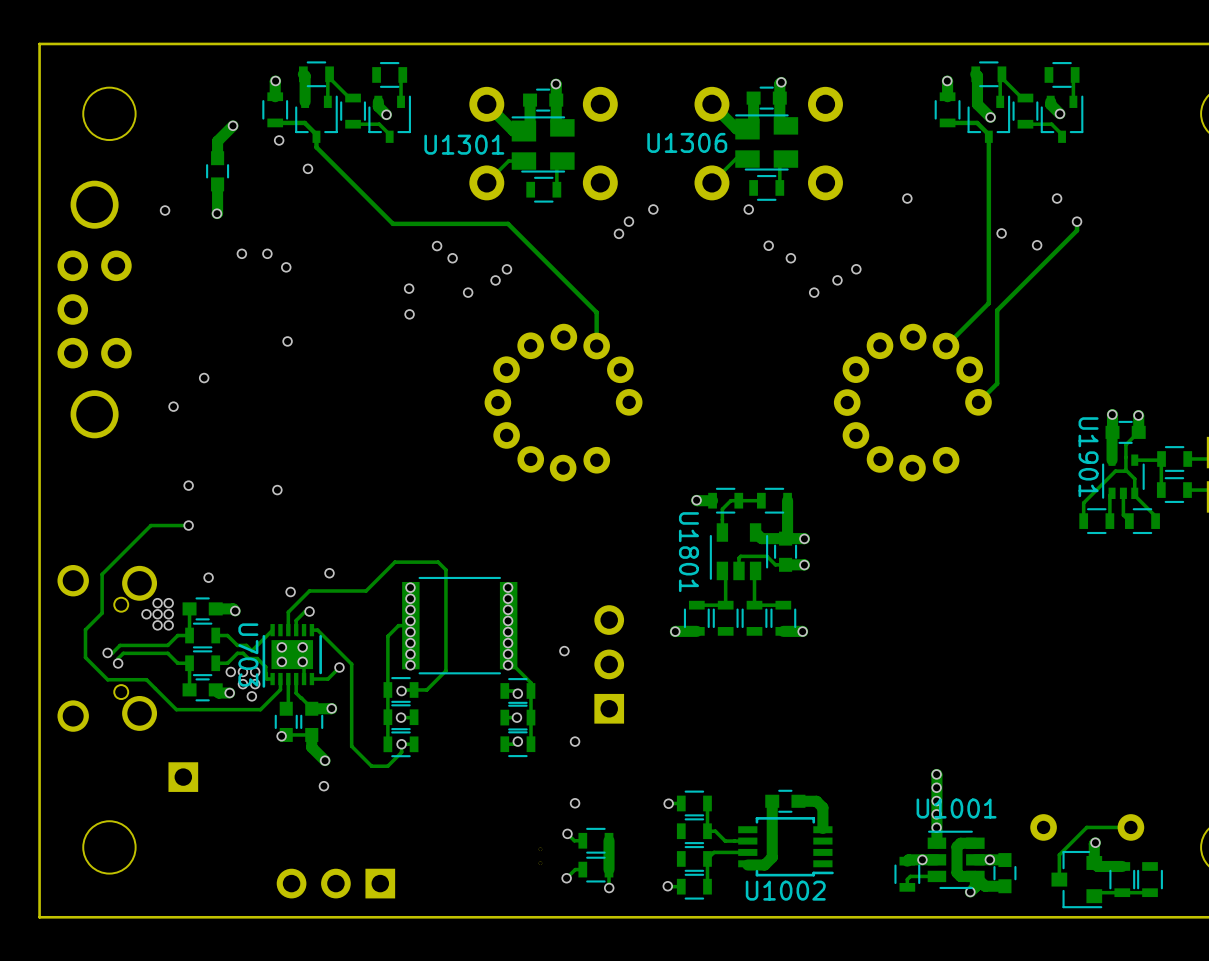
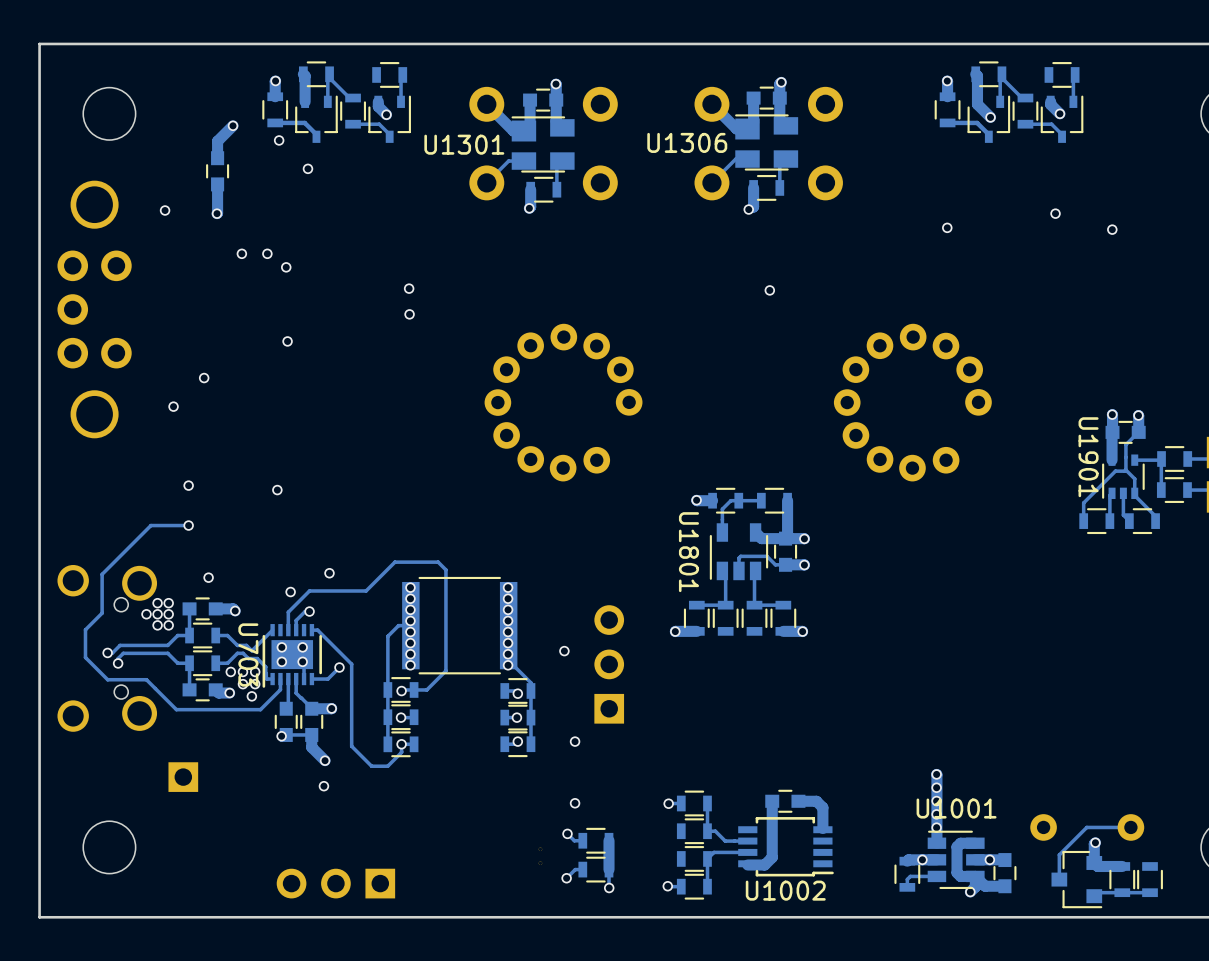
track: (316, 136) (316, 147) (393, 223) (508, 223) (596, 312) (596, 346) -> none
track: (988, 136) (988, 303) (945, 346) -> none
track: none -> (753, 187) (752, 207)
track: none -> (530, 189) (529, 208)
via: (907, 198) -> none
via: (1057, 198) -> none
via: none -> (529, 208)
via: (653, 209) -> none
via: none -> (1055, 213)
via: (628, 221) -> none
track: (1077, 221) (1077, 230) (997, 310) (997, 383) (978, 402) -> none
via: (1077, 221) -> none
via: none -> (947, 227)
via: none -> (1112, 229)
via: (618, 233) -> none
via: (1001, 233) -> none
via: (768, 245) -> none
via: (1037, 245) -> none
via: (437, 246) -> none
via: (452, 258) -> none
via: (790, 258) -> none
via: (506, 269) -> none
via: (856, 269) -> none
via: (495, 280) -> none
via: (837, 280) -> none
via: none -> (769, 290)
via: (468, 292) -> none
via: (814, 292) -> none

